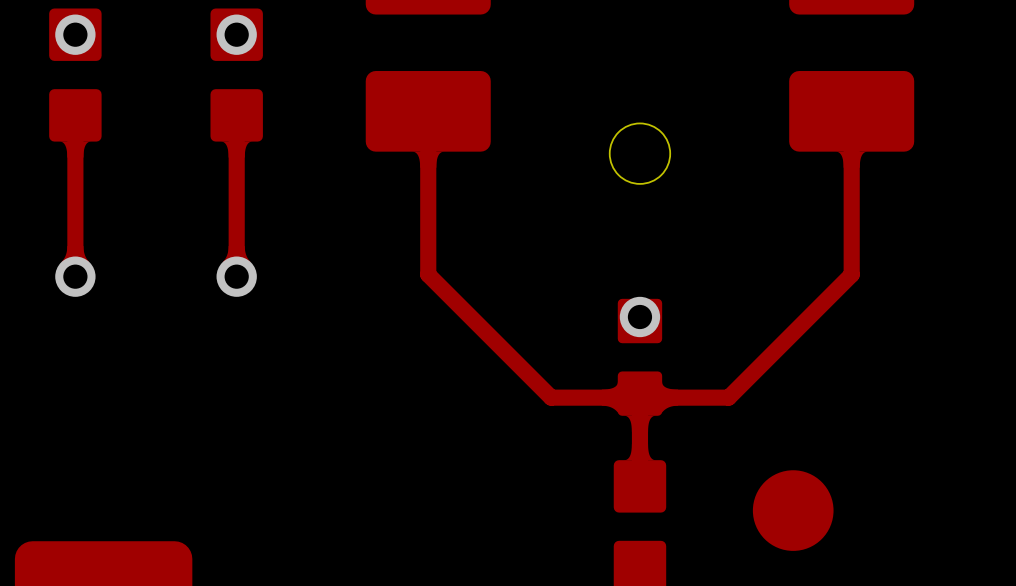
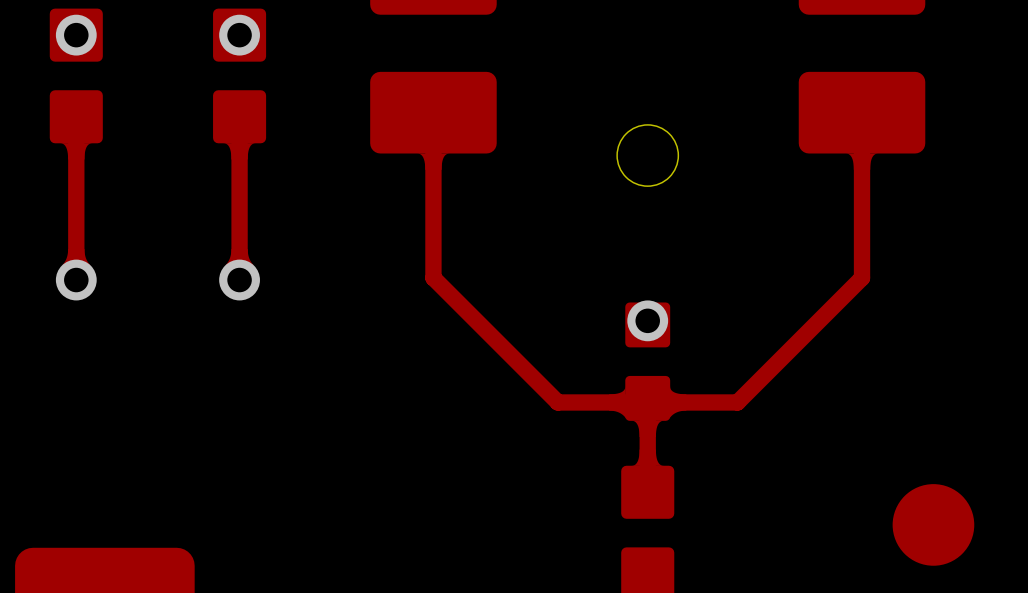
part position: (793, 510) -> (933, 524)

